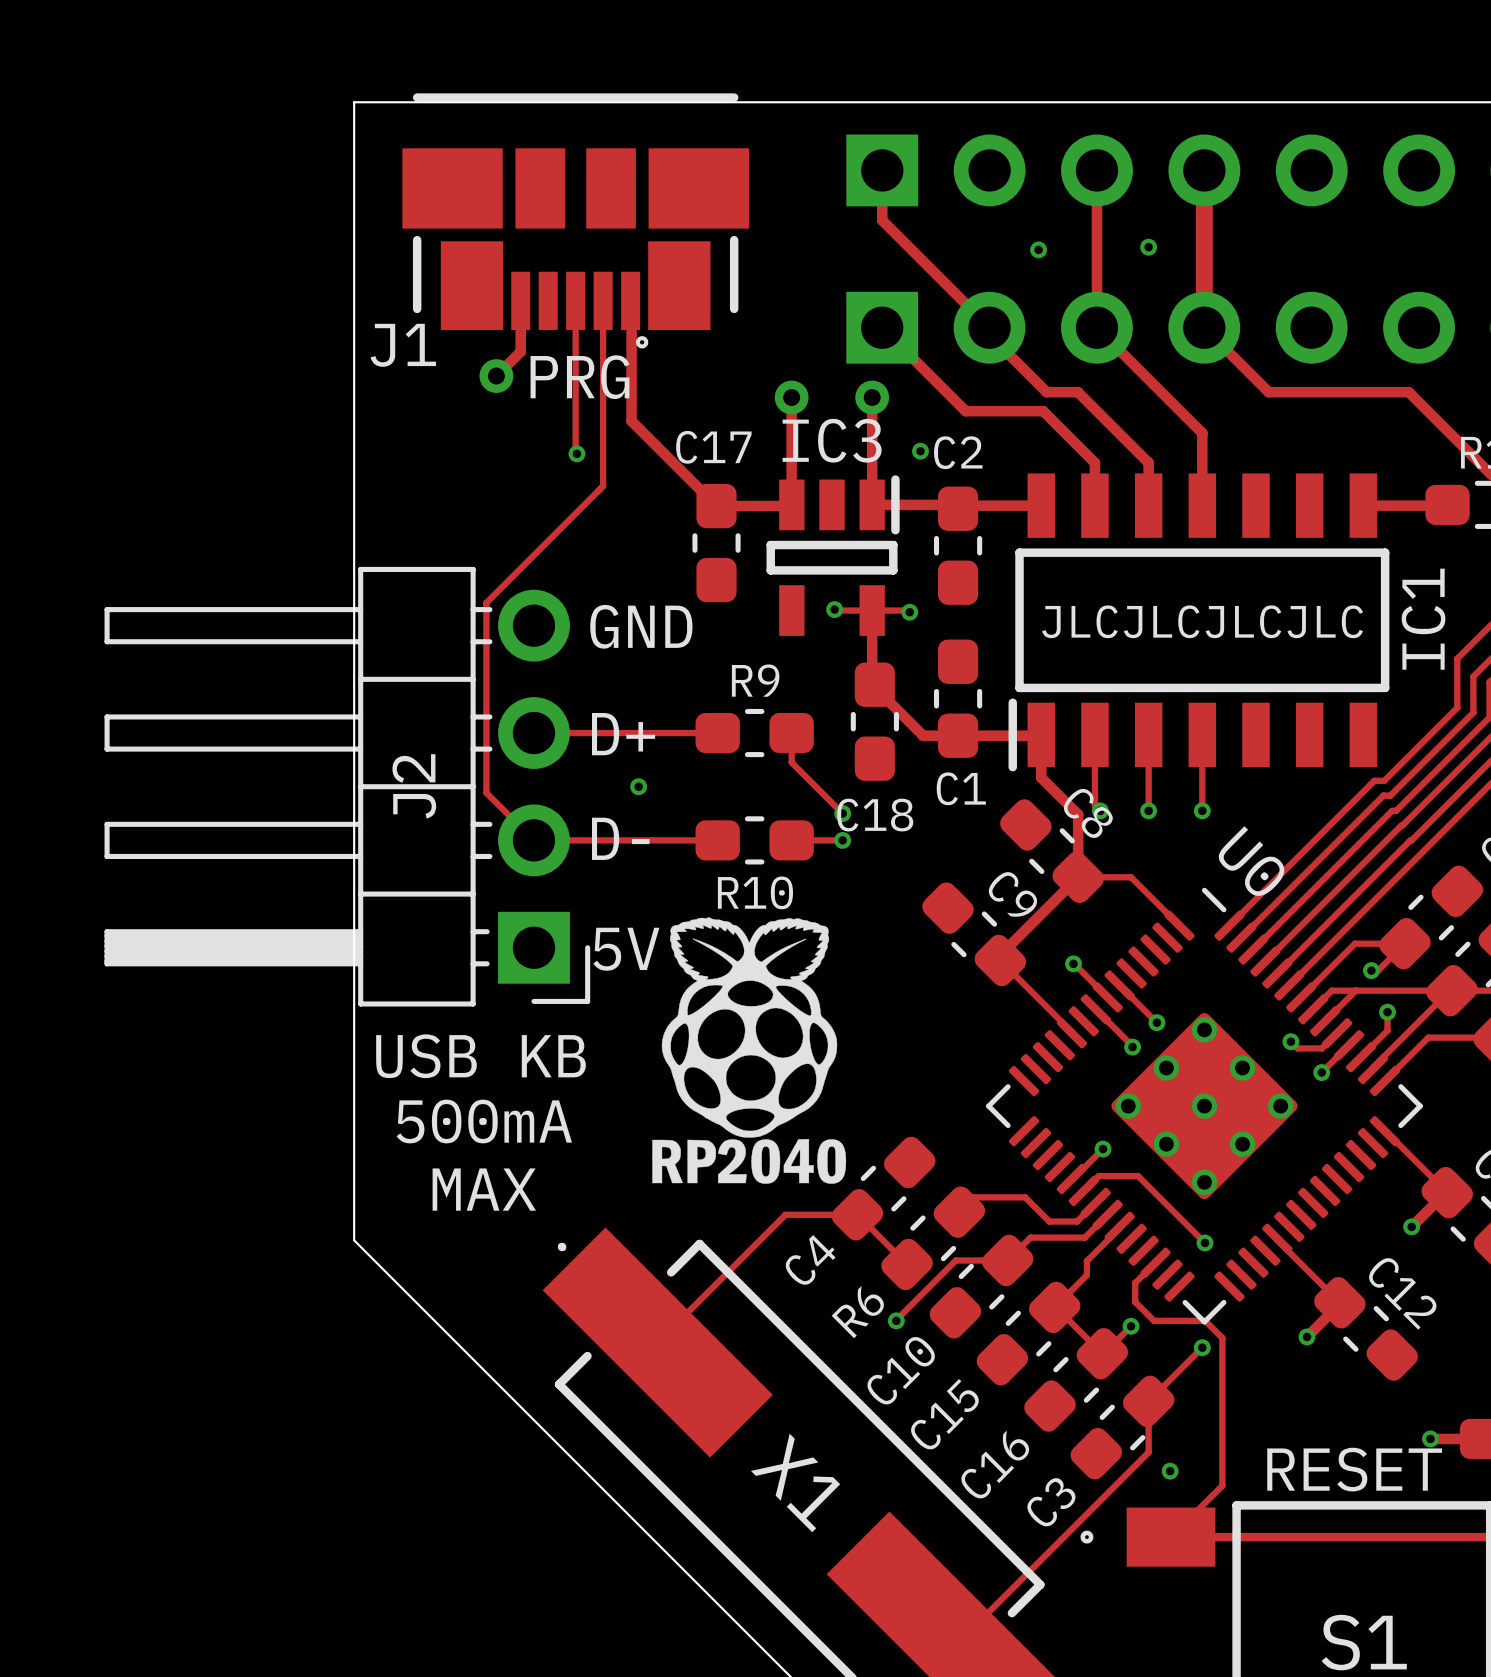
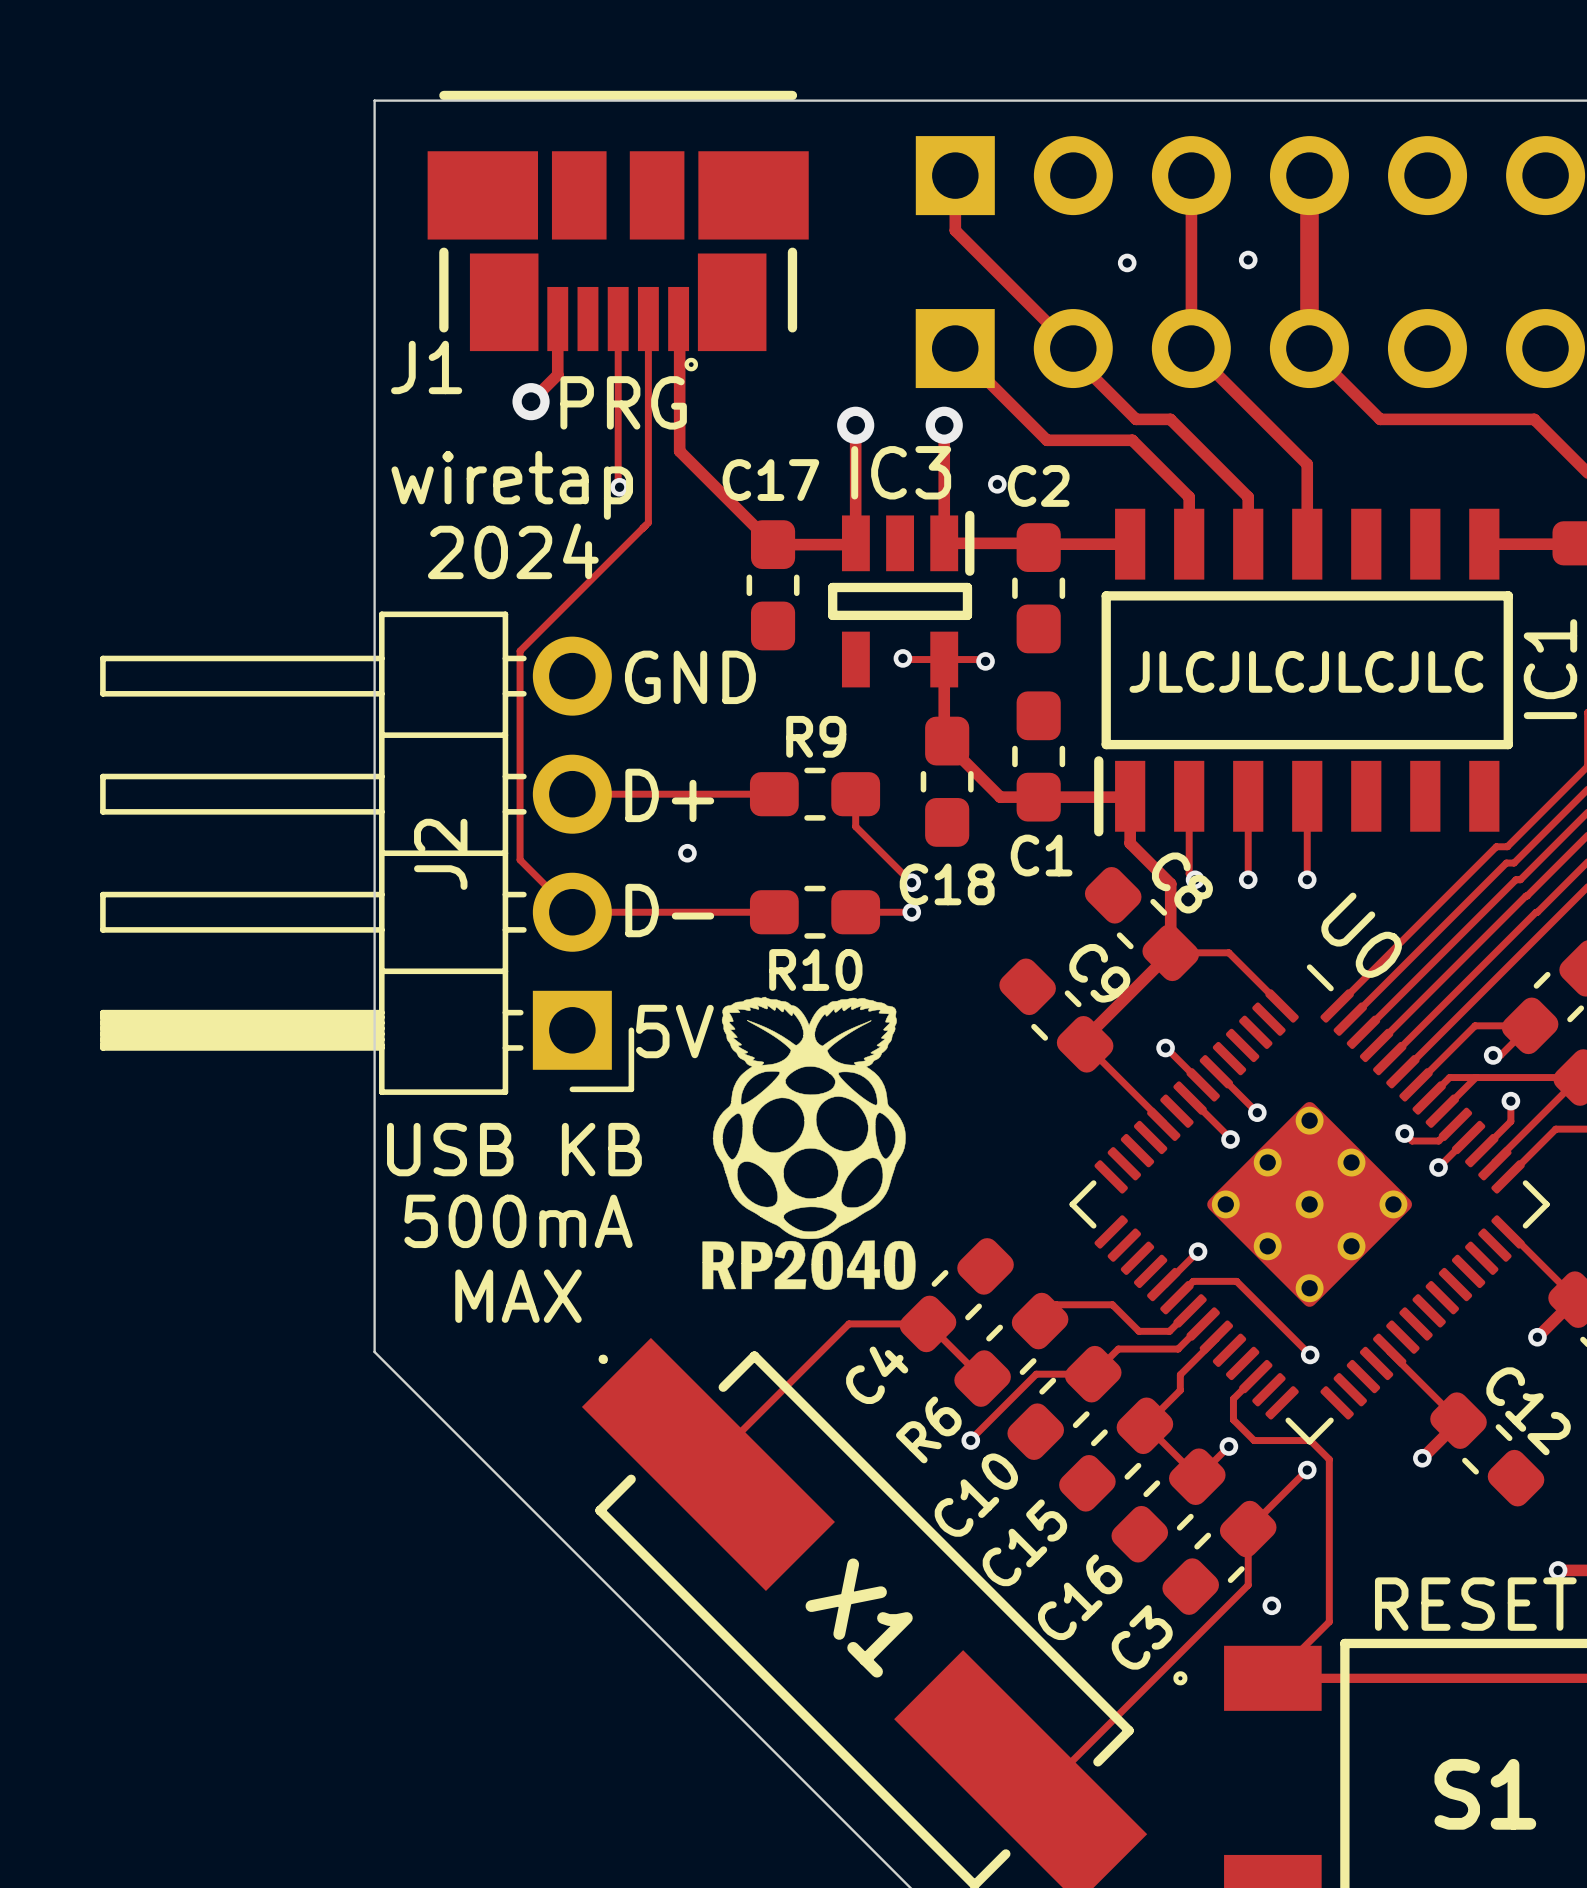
text: none -> wiretap (512, 485)
text: none -> 2024 (513, 551)

